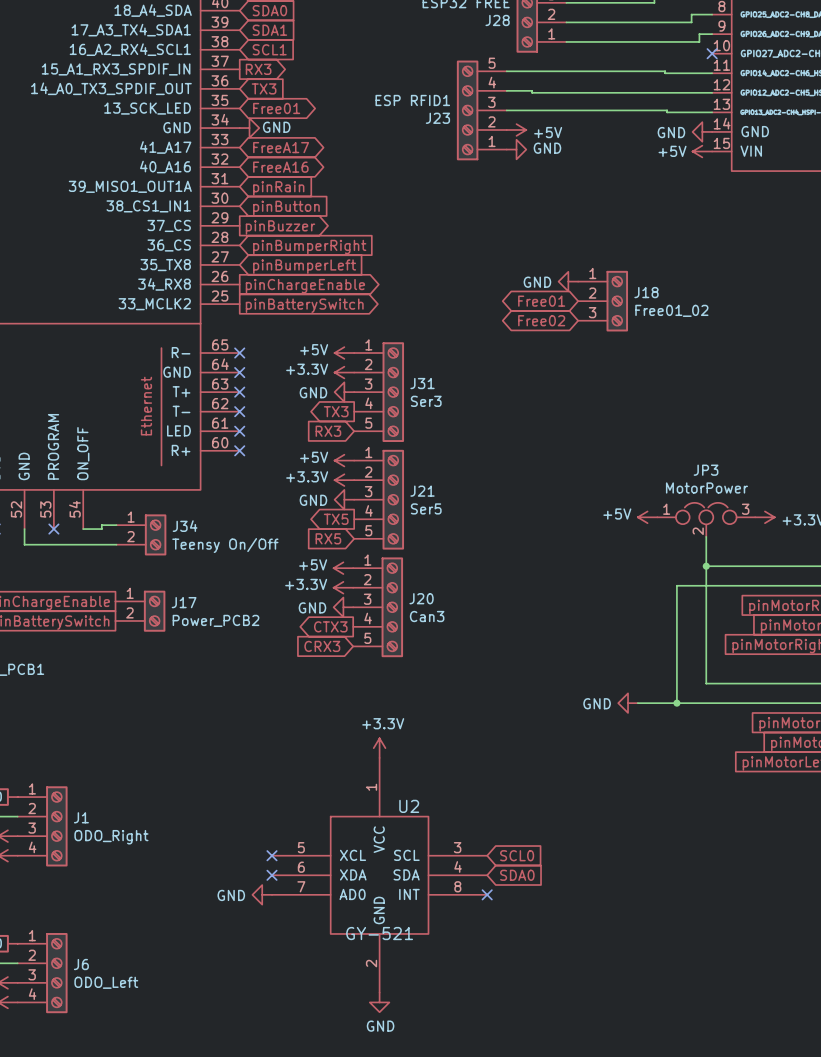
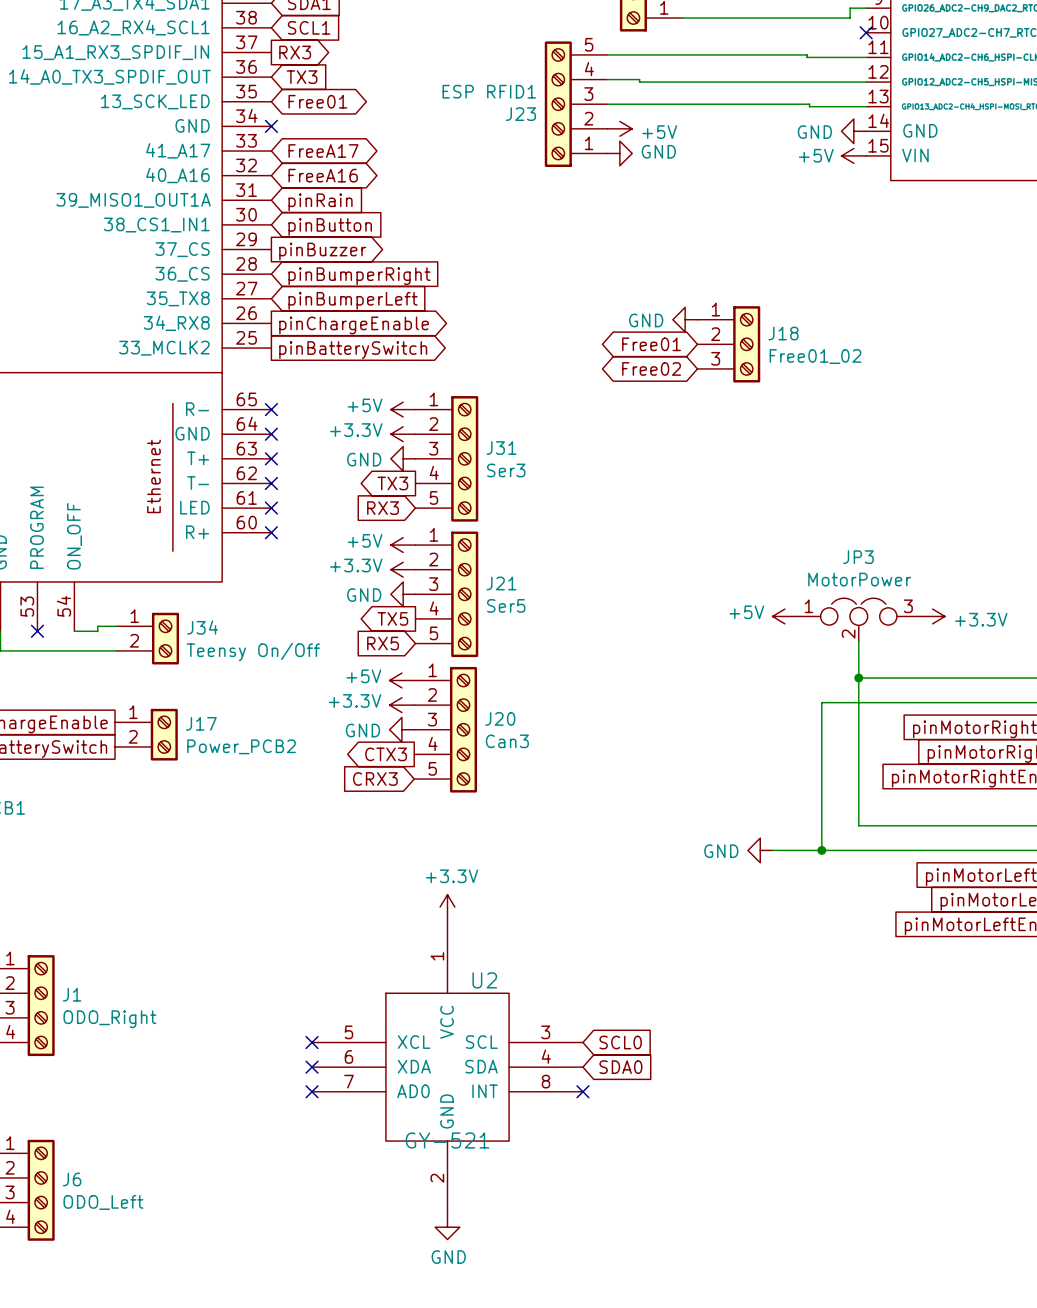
no-connect mark: none -> (271, 126)
power symbol: GND (249, 128) -> none
power symbol: GND (262, 894) -> none
no-connect mark: none -> (312, 1091)

